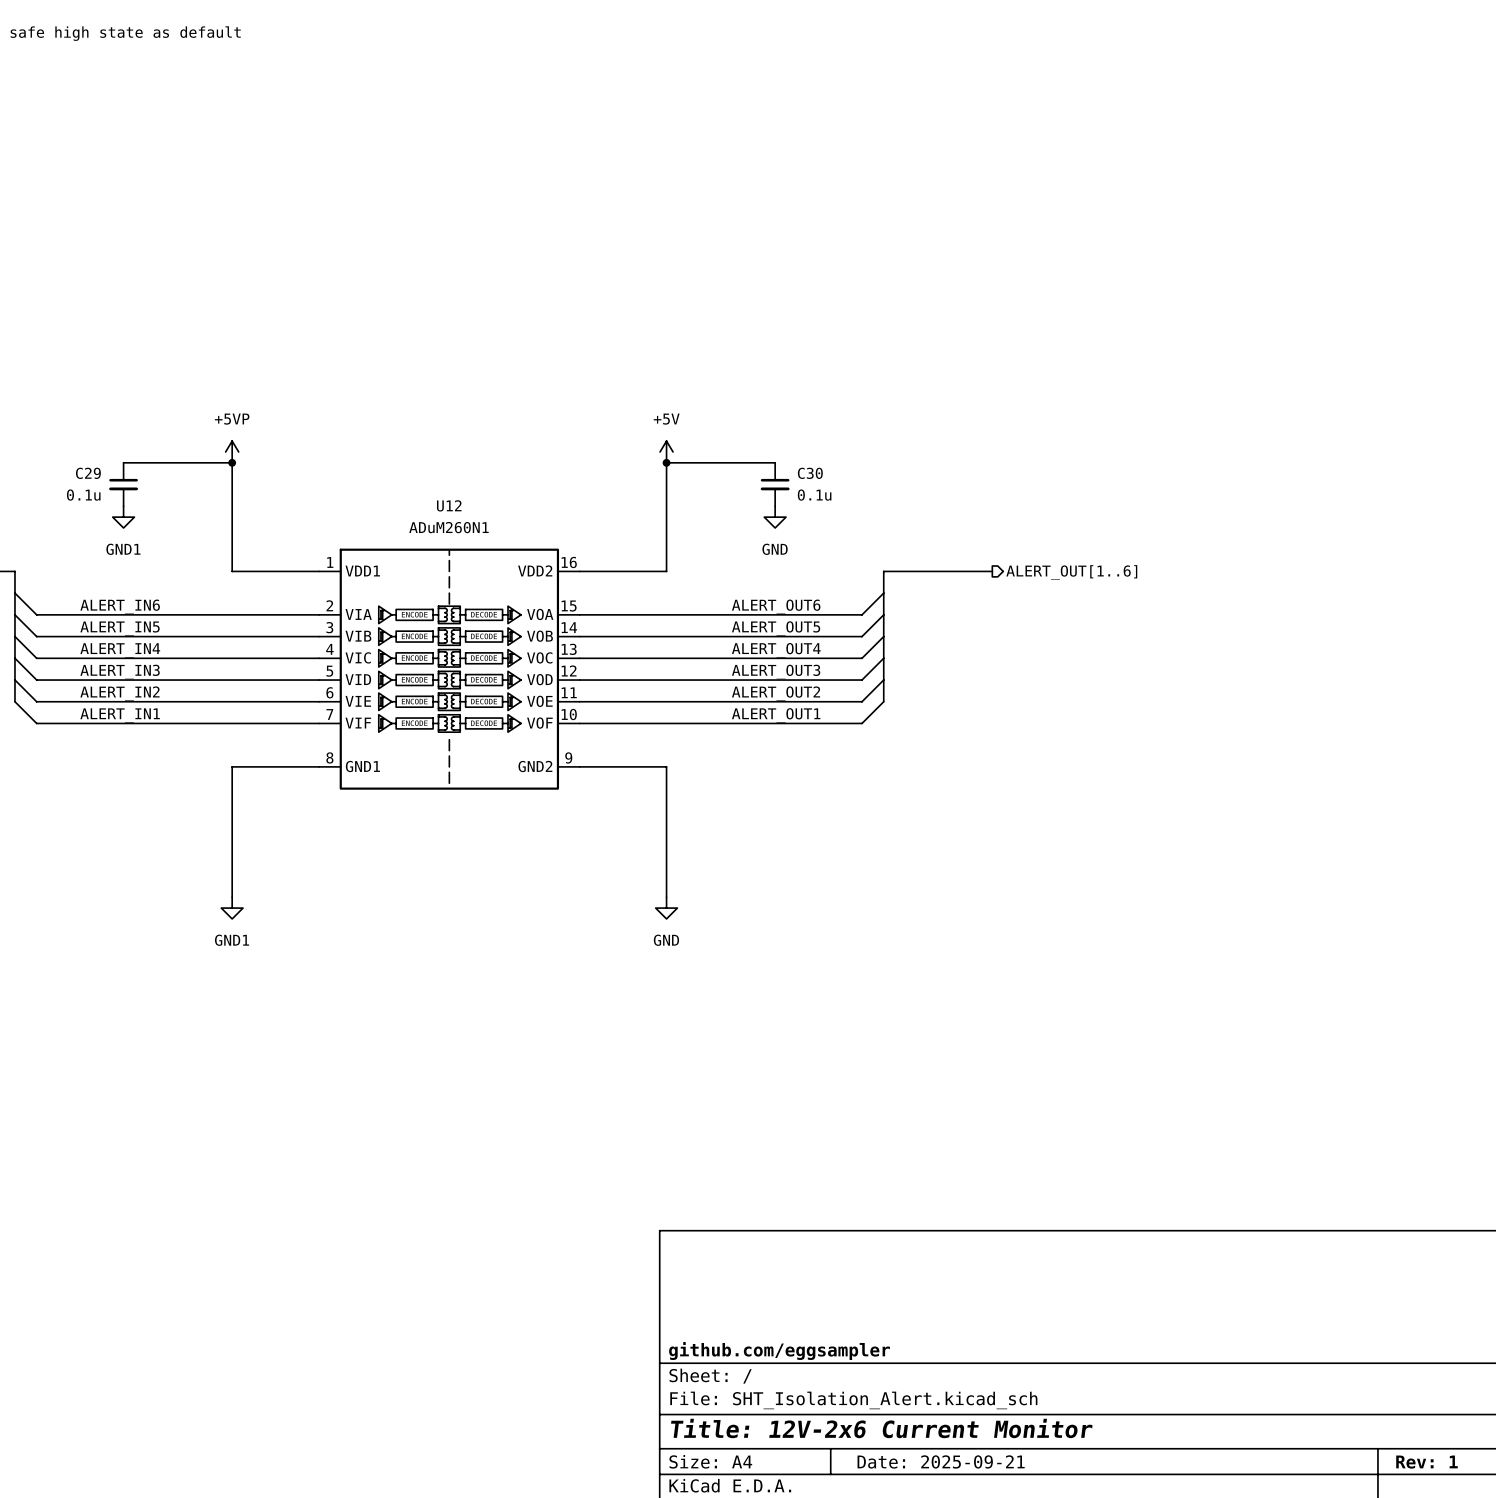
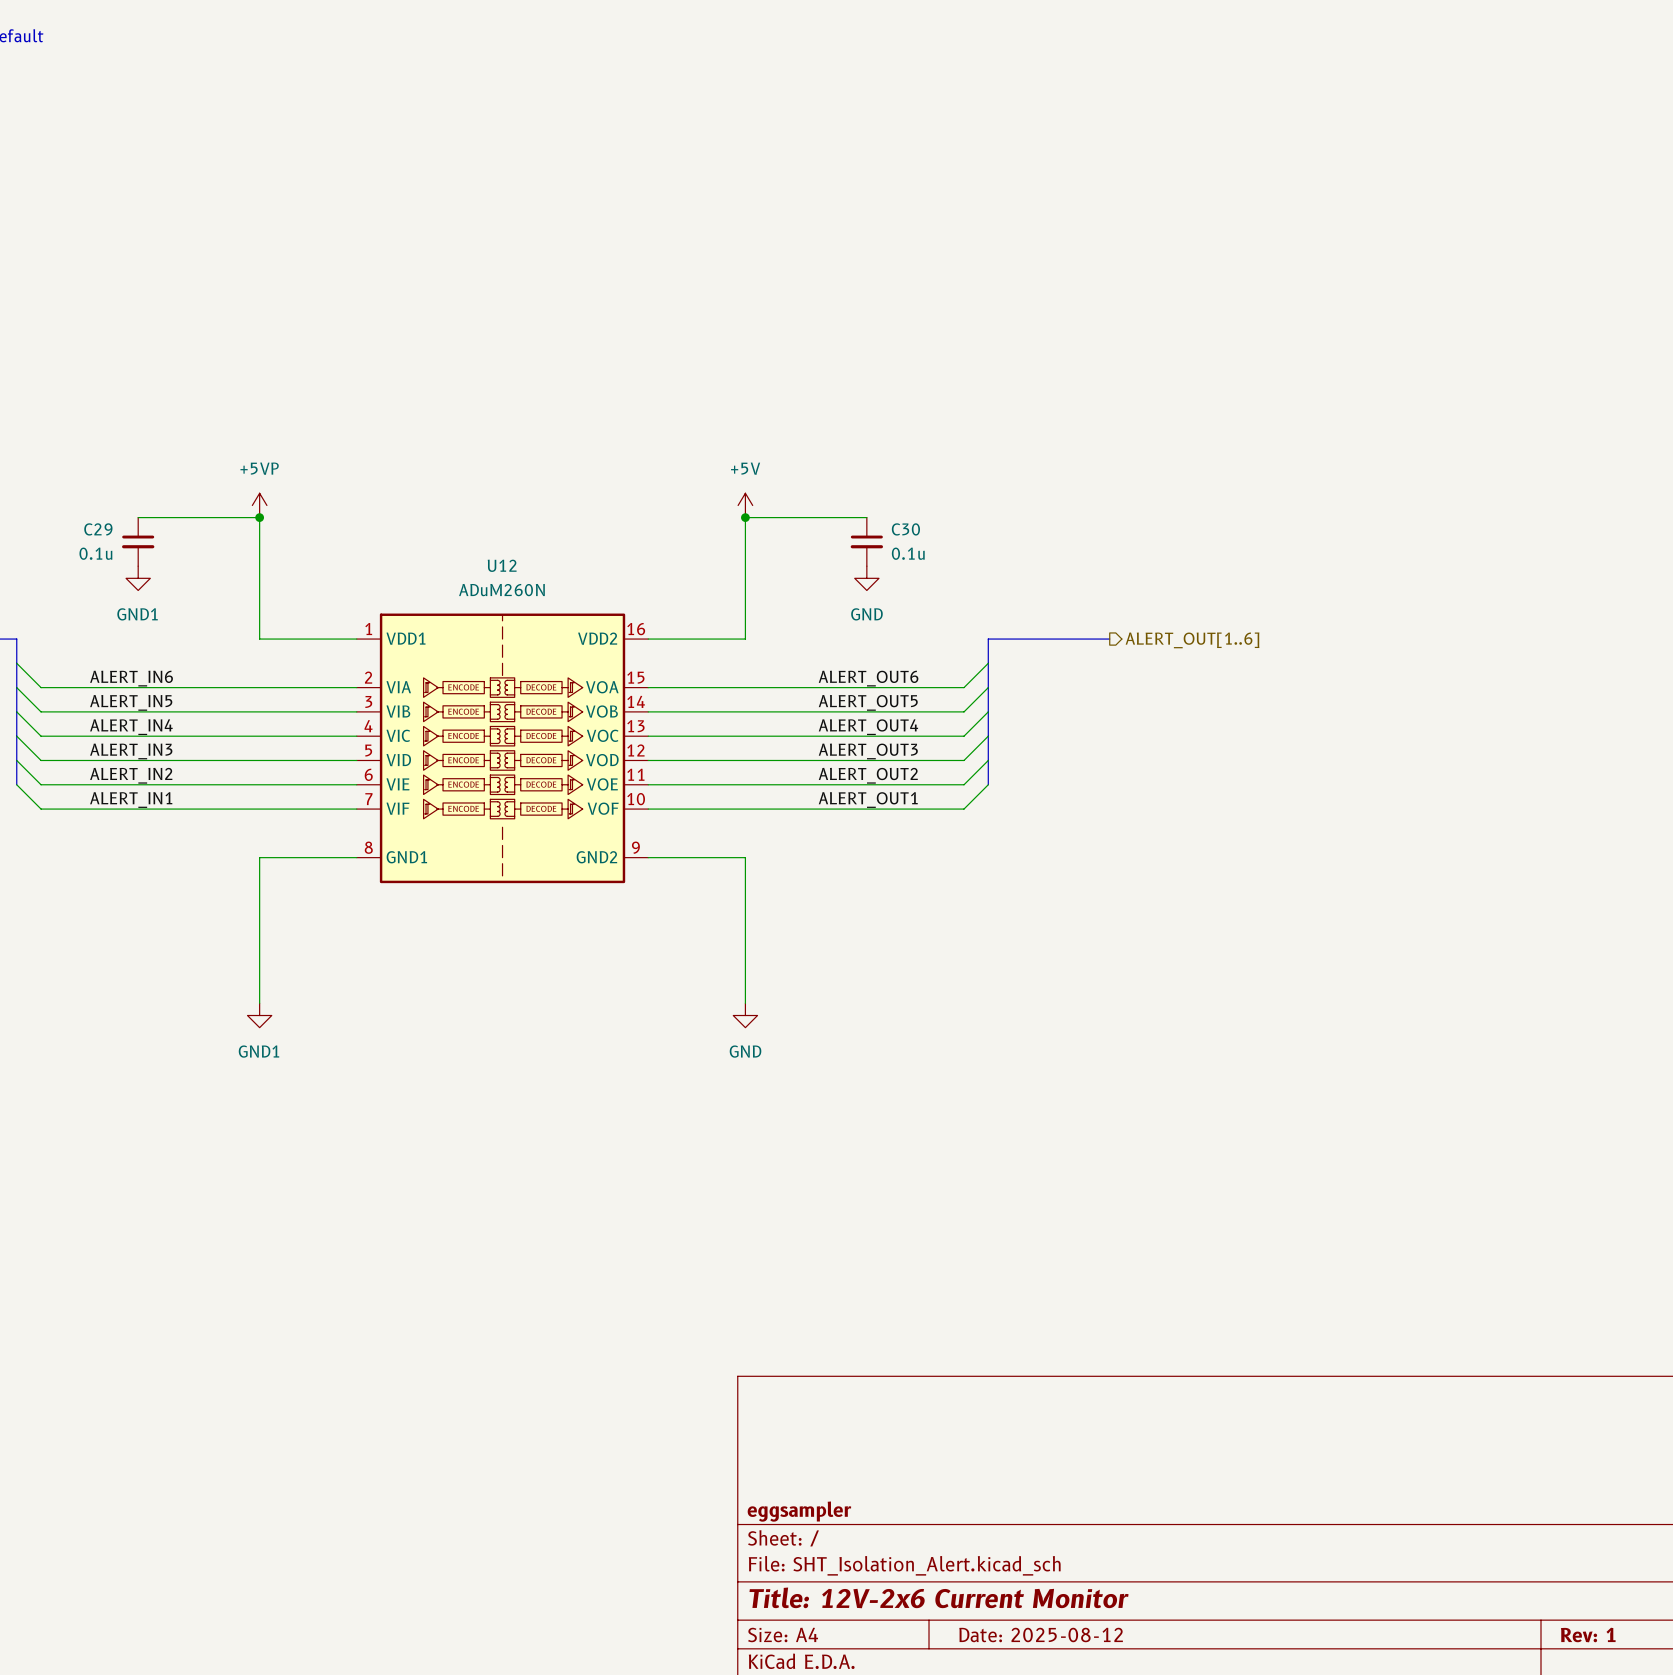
U12 value: ADuM260N1 (448, 527) -> ADuM260N (501, 590)
title block: github.com/eggsampler (779, 1351) -> eggsampler (799, 1511)
title block: Date: 2025-09-21 (941, 1461) -> Date: 2025-08-12 (1041, 1634)

